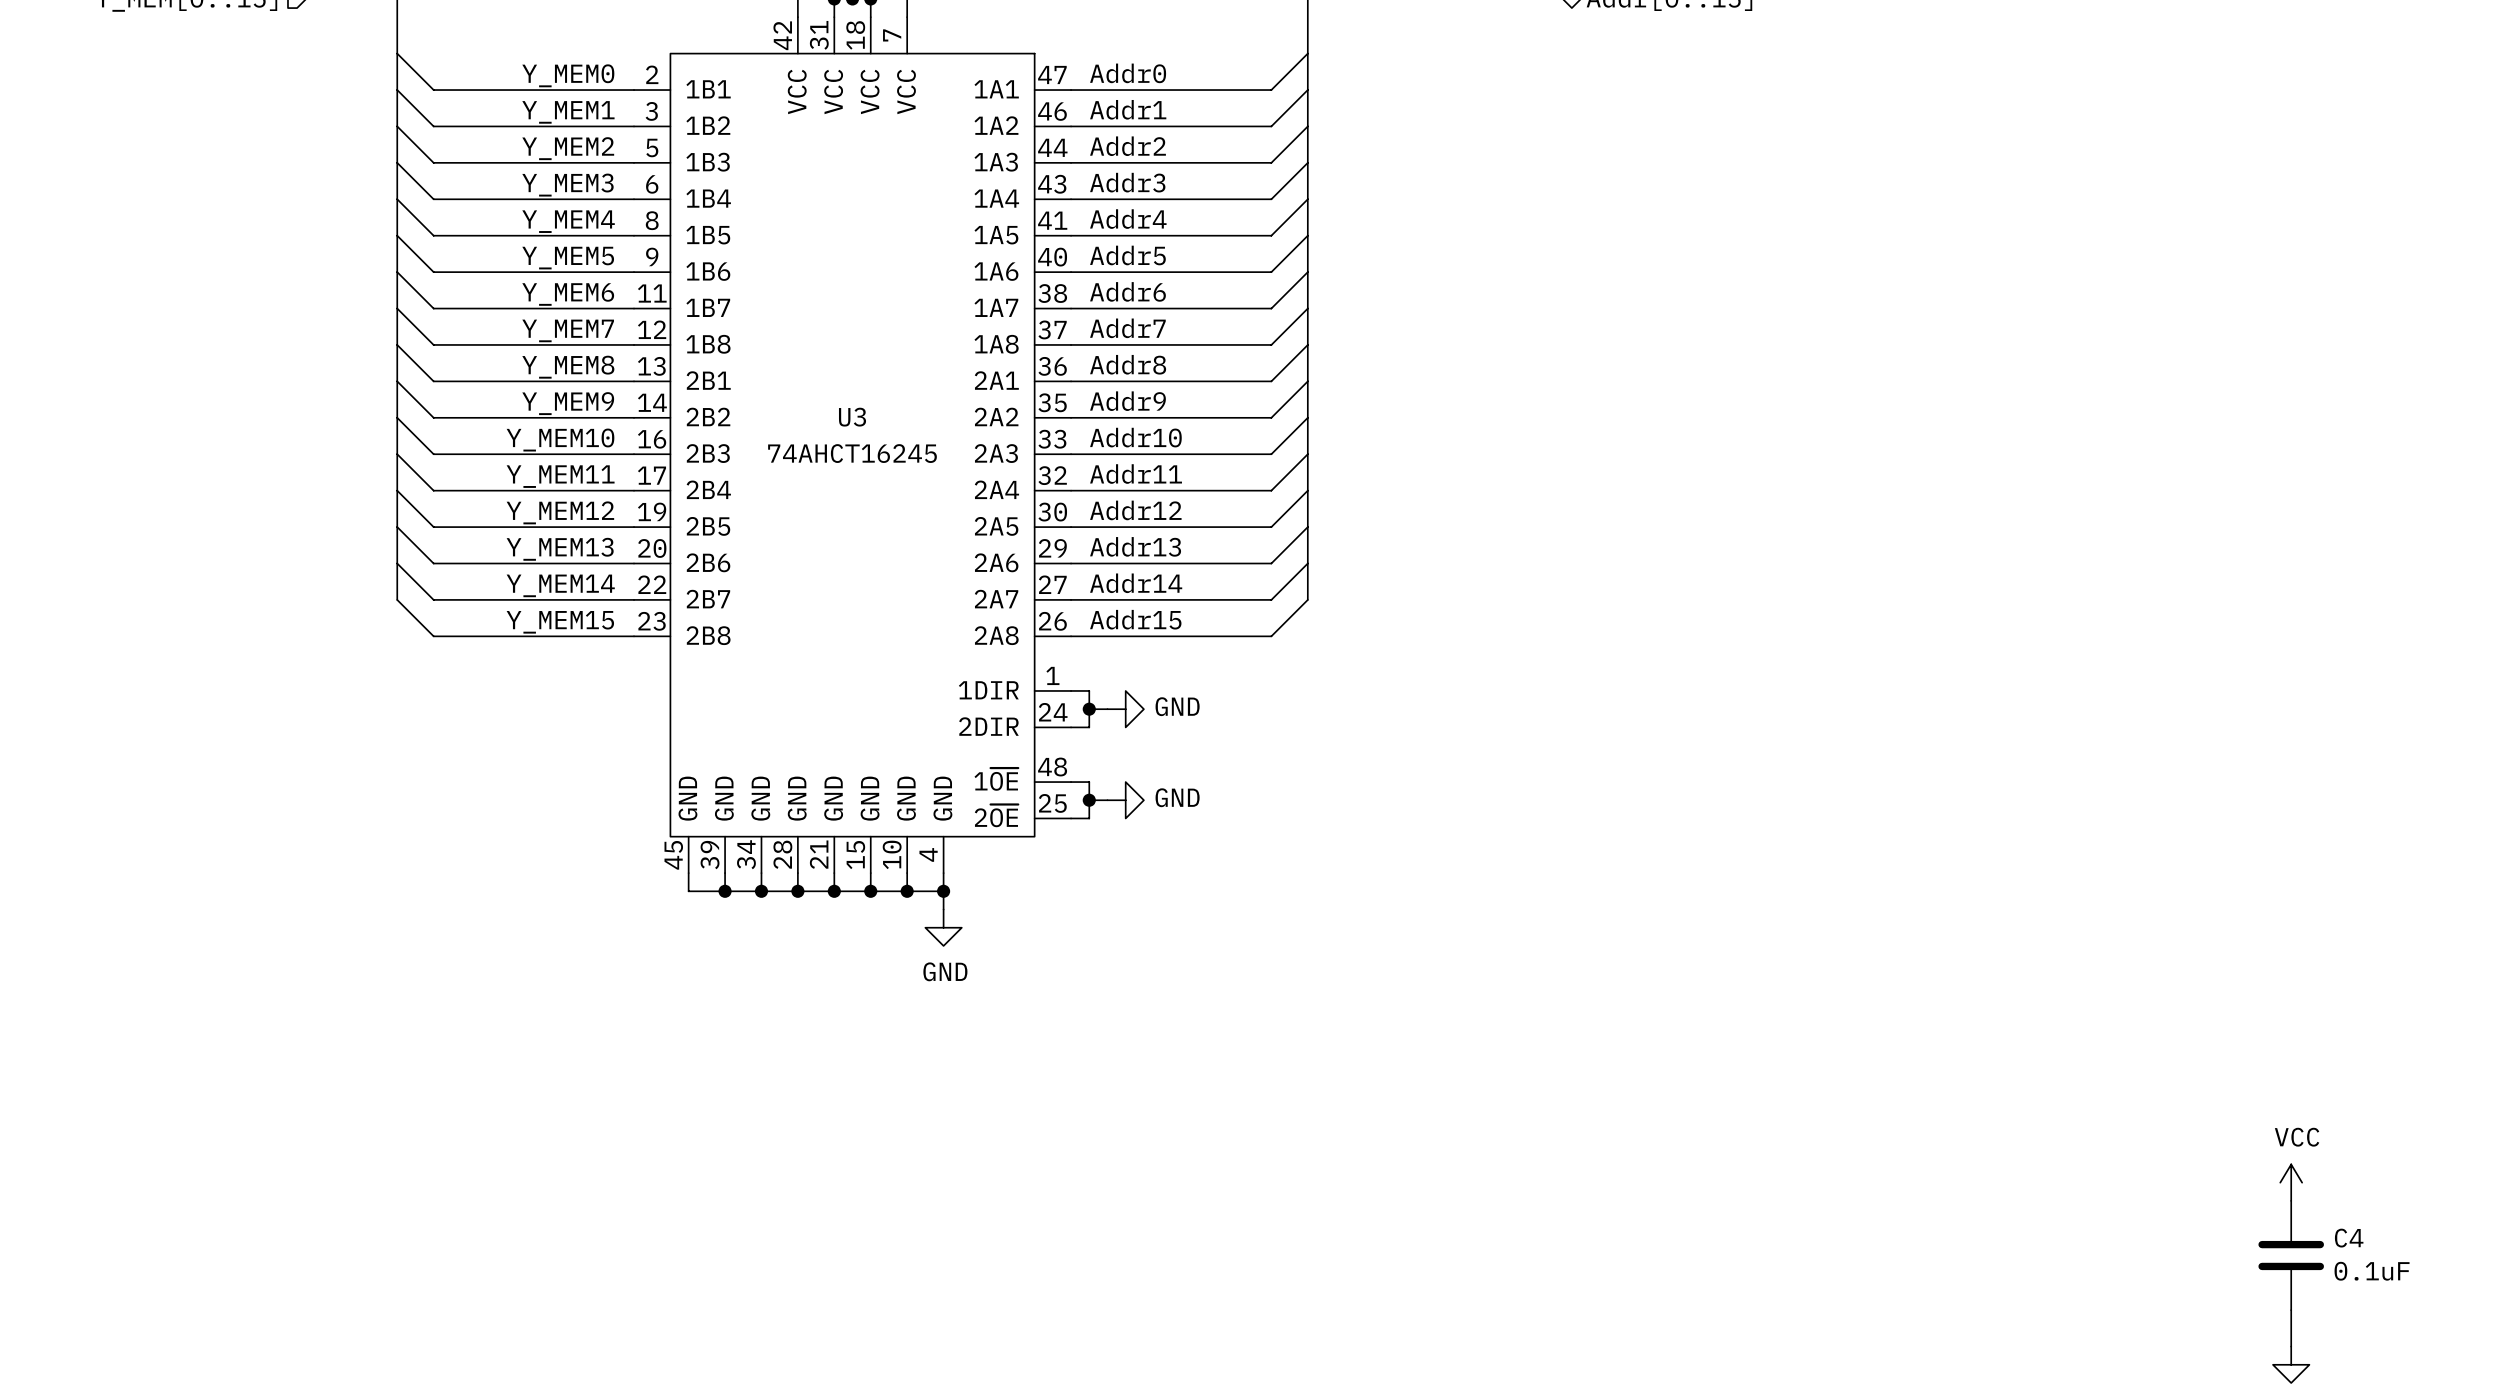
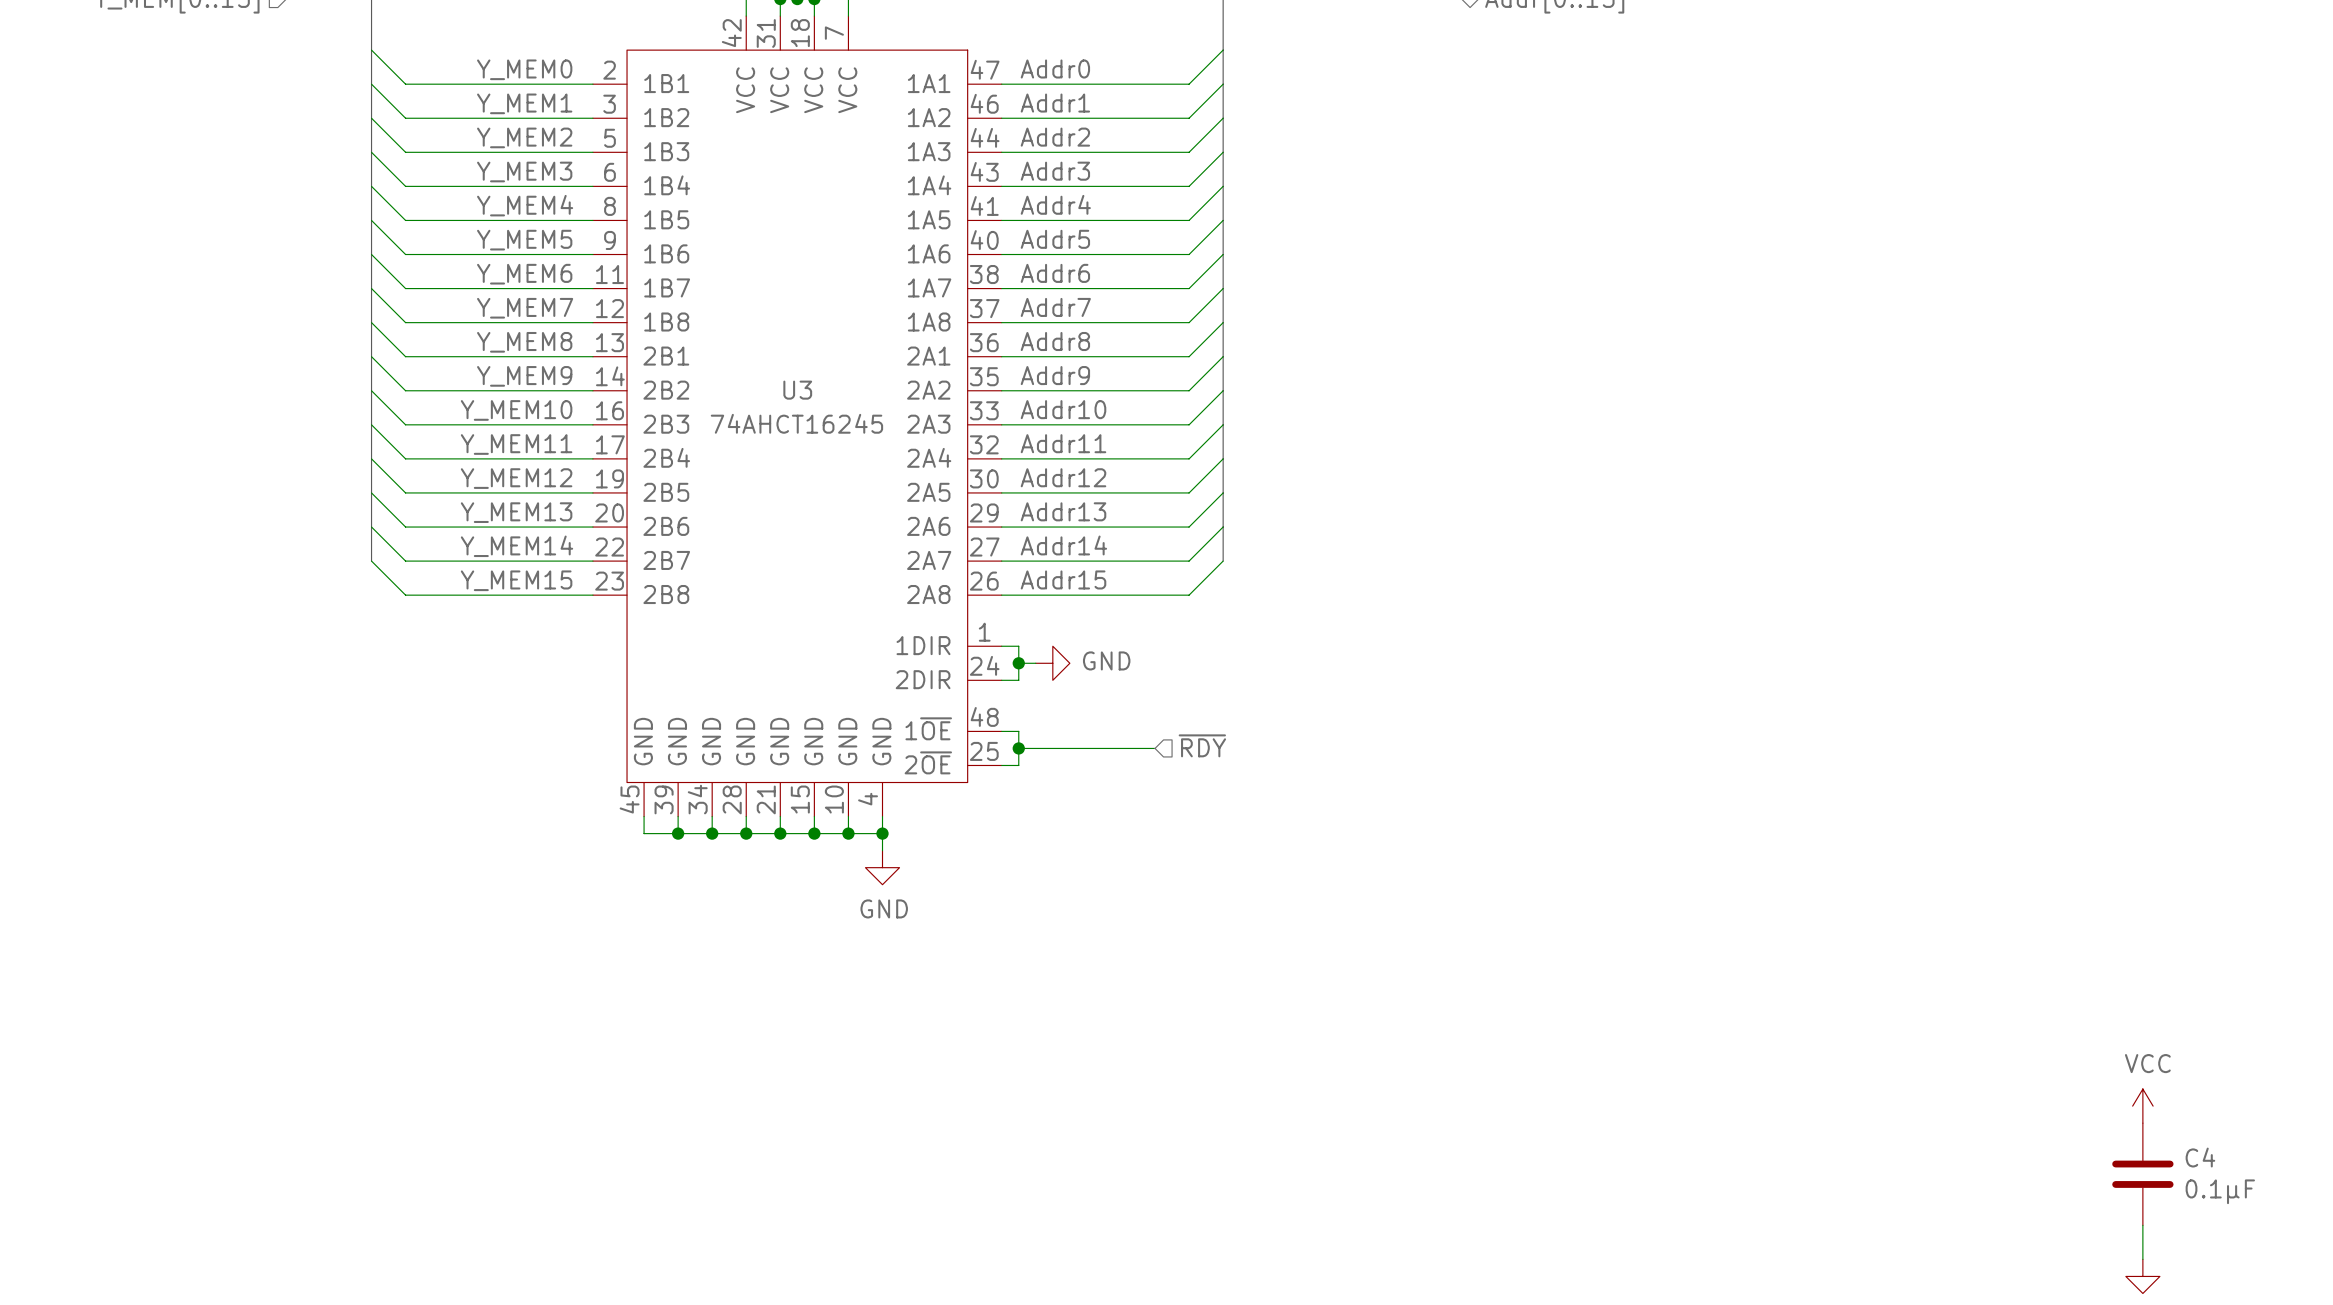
hierarchical label: none -> ~{RDY} (1202, 745)
wire: none -> (1035, 748) (1155, 748)
power symbol: GND (1125, 800) -> none
C4 value: 0.1uF (2372, 1271) -> 0.1μF (2220, 1191)

